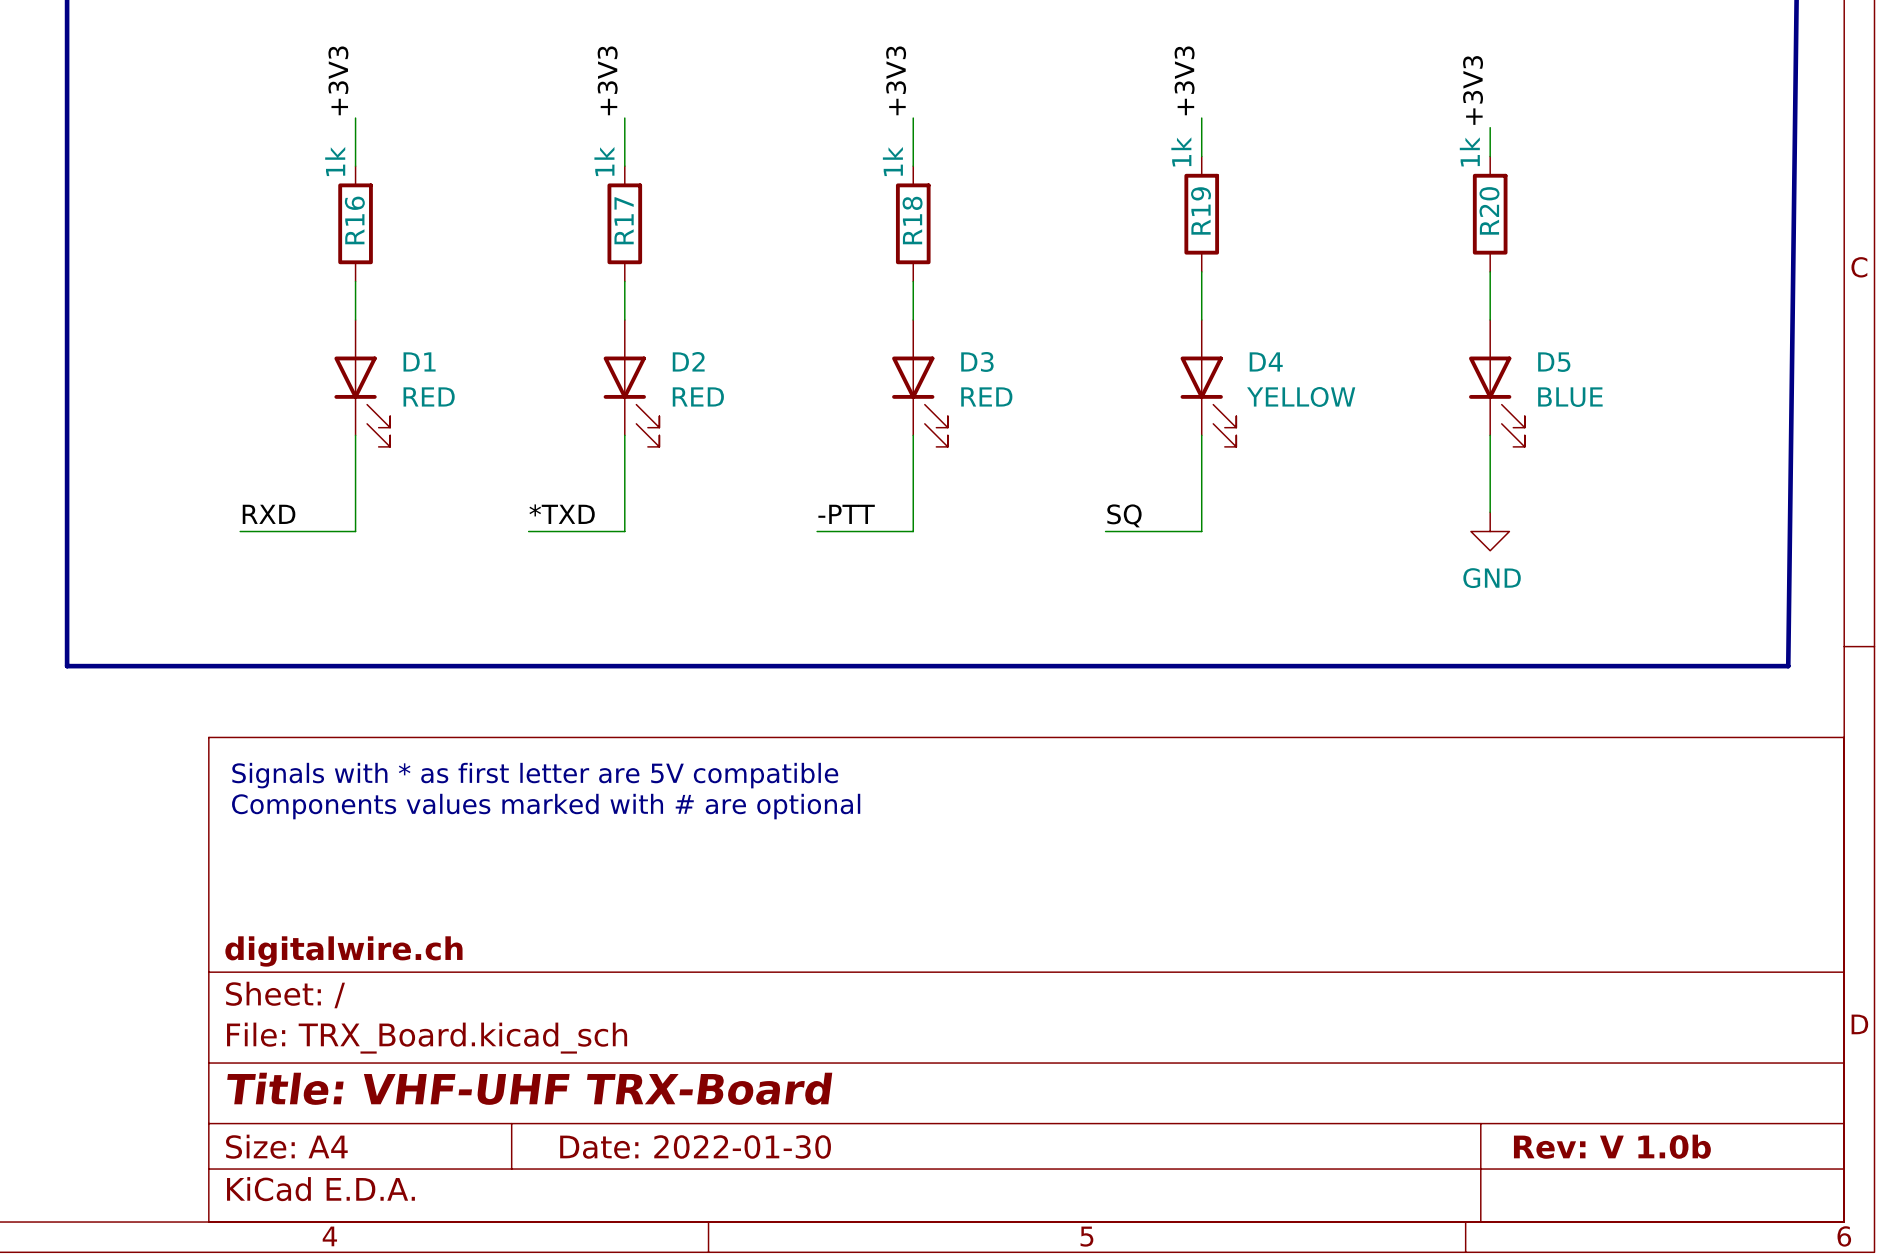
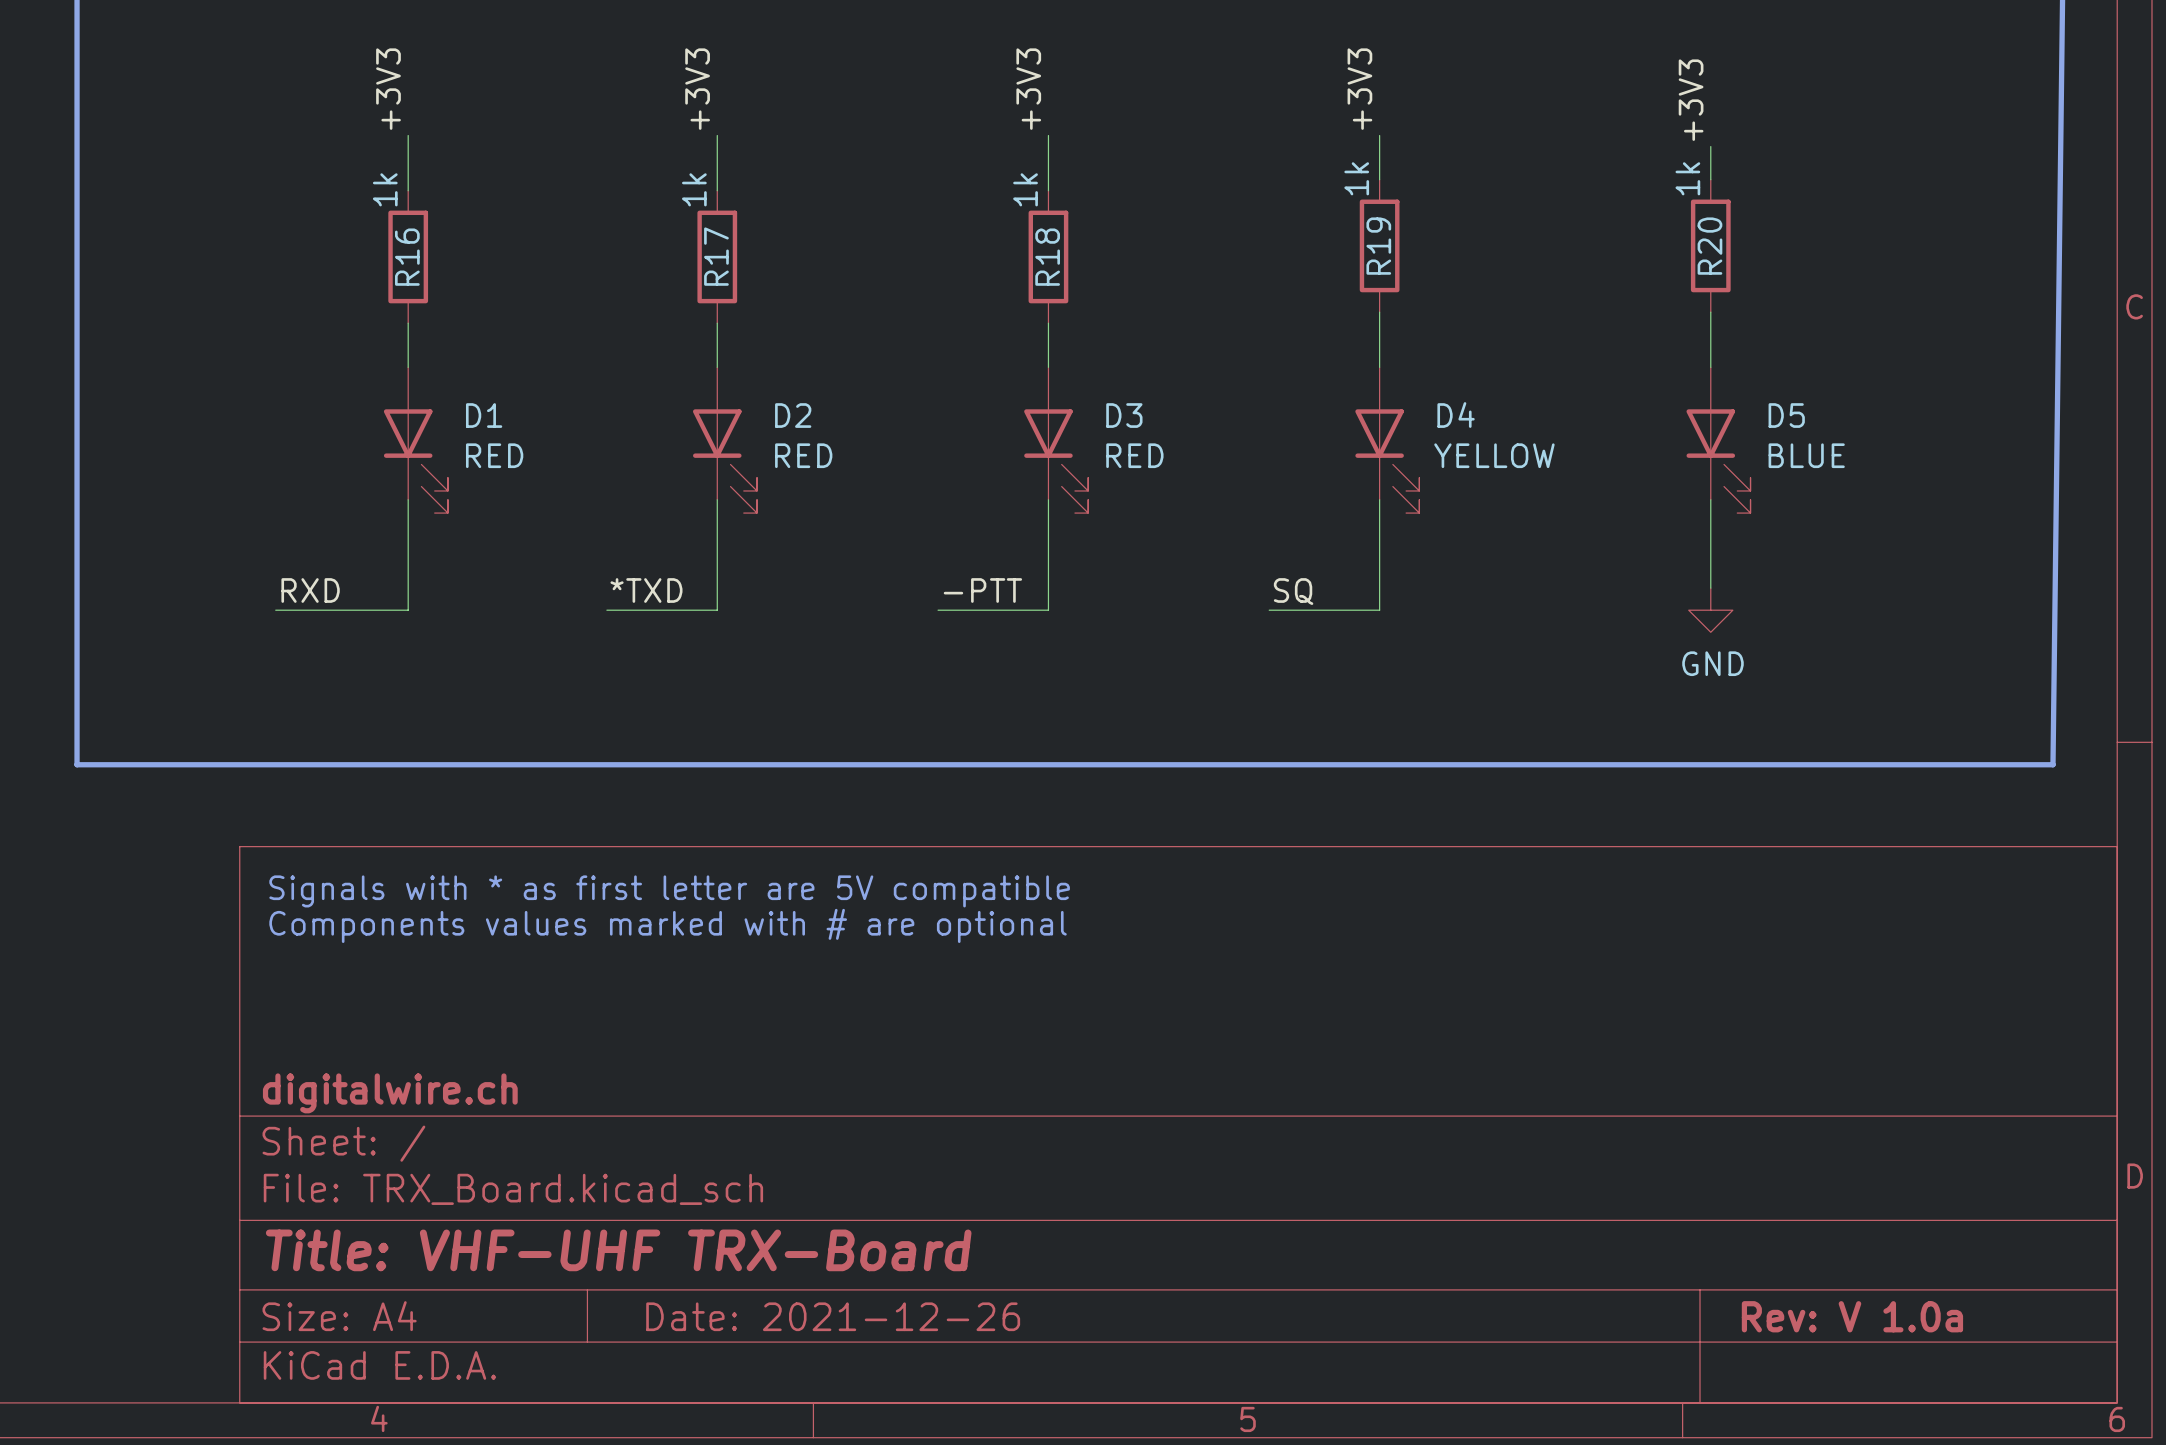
title block: Date: 2022-01-30 (695, 1146) -> Date: 2021-12-26 (833, 1316)
title block: Rev: V 1.0b (1612, 1146) -> Rev: V 1.0a (1852, 1316)

